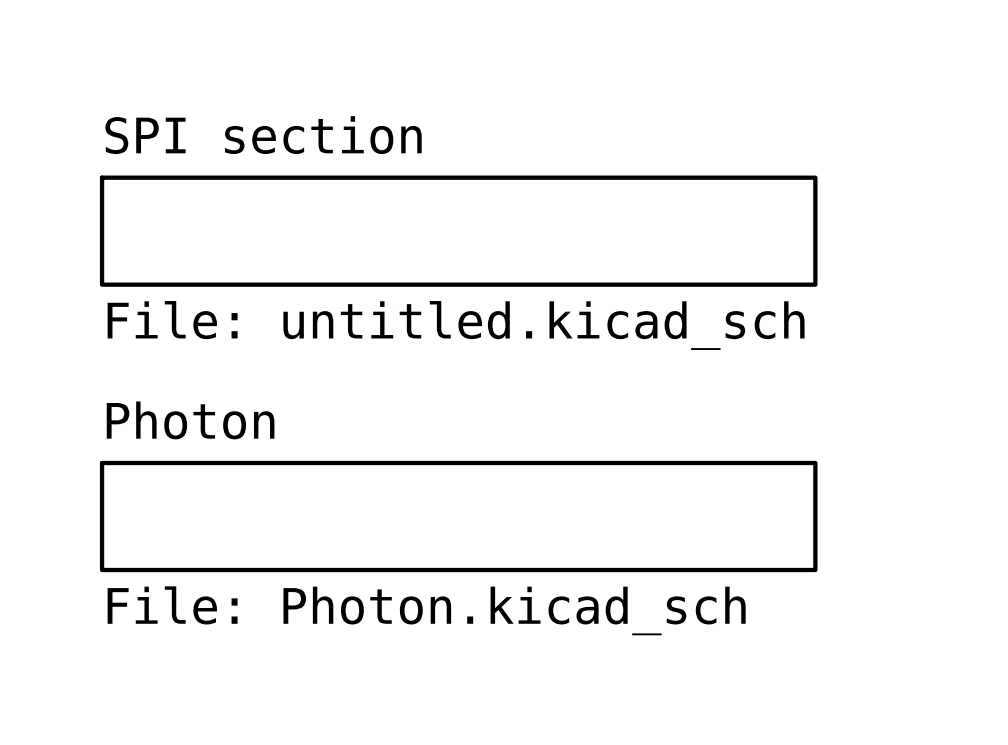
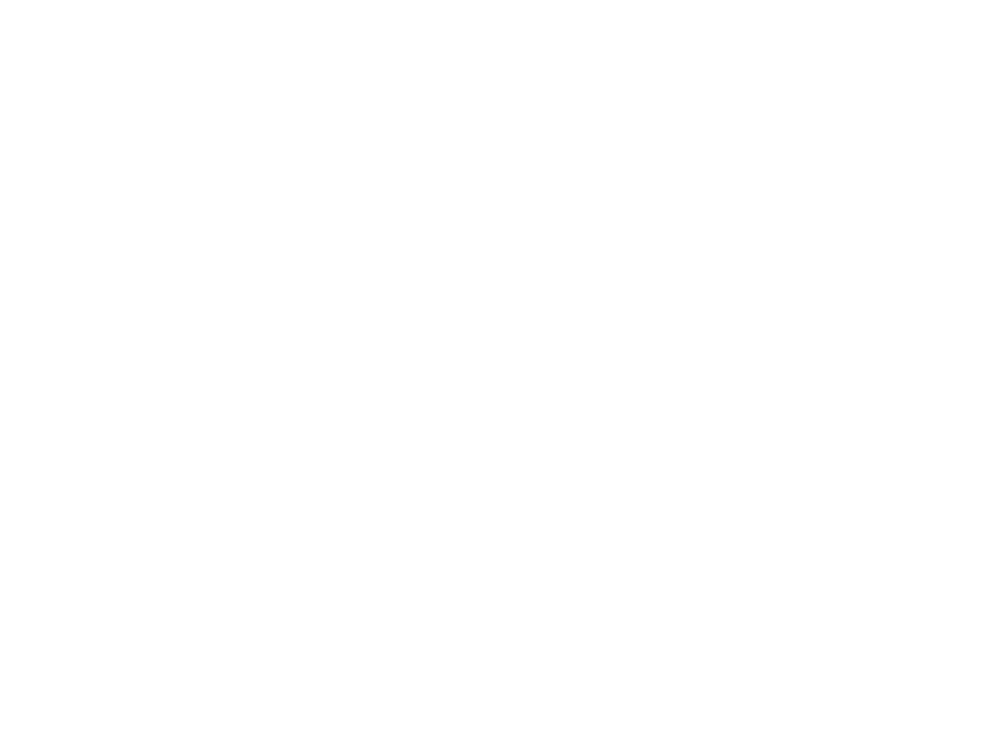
sheet SPI section: File: untitled.kicad_sch (458, 231) -> none
sheet Photon: File: Photon.kicad_sch (458, 516) -> none

